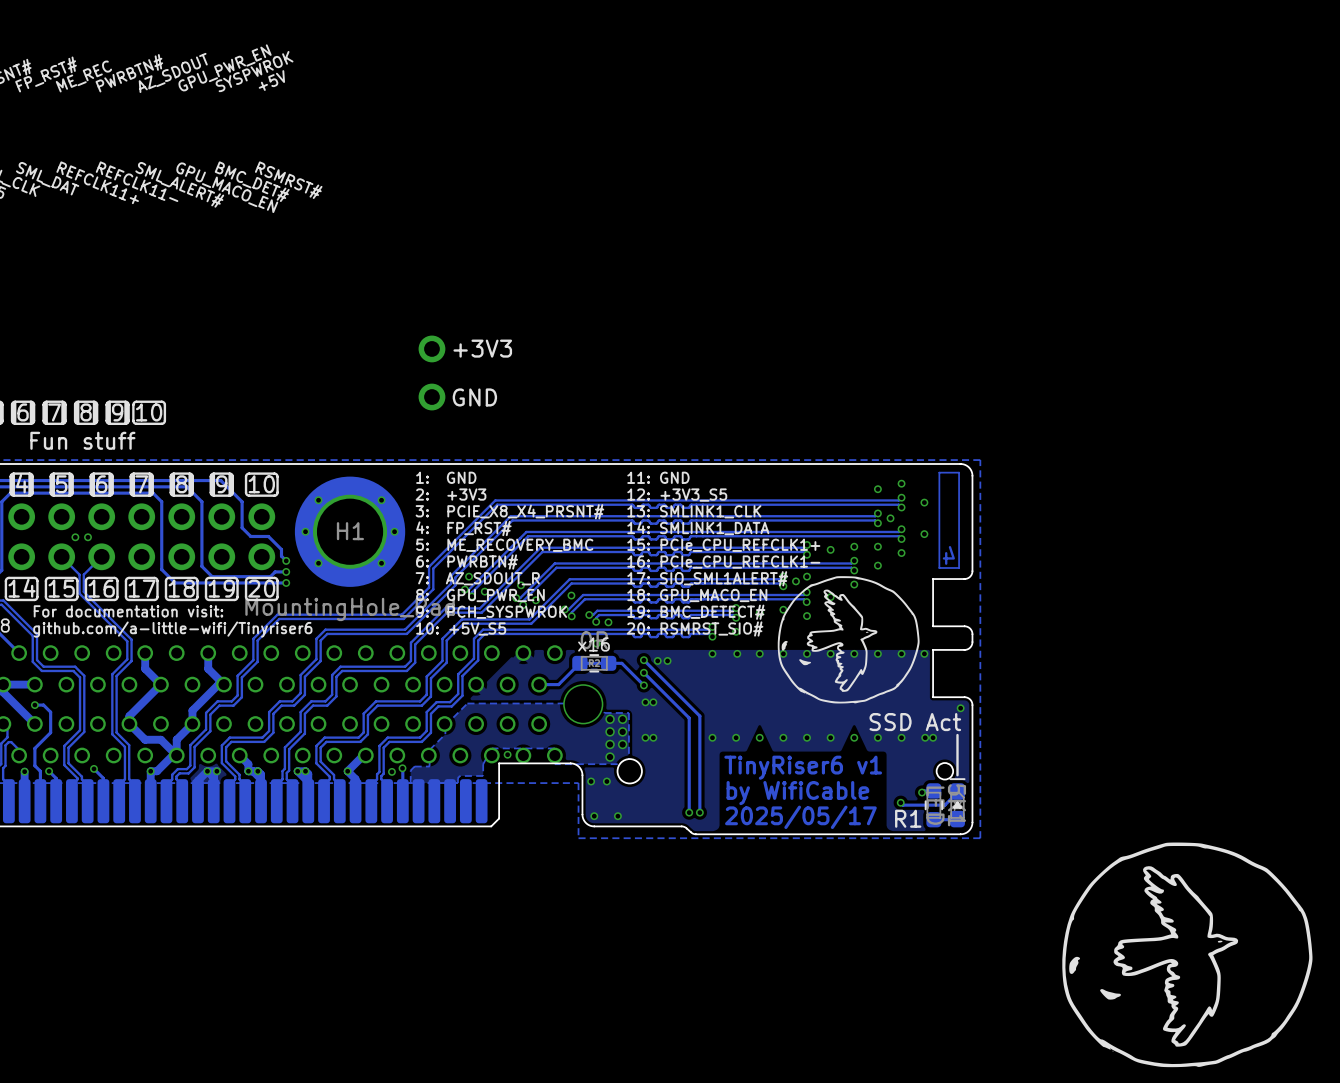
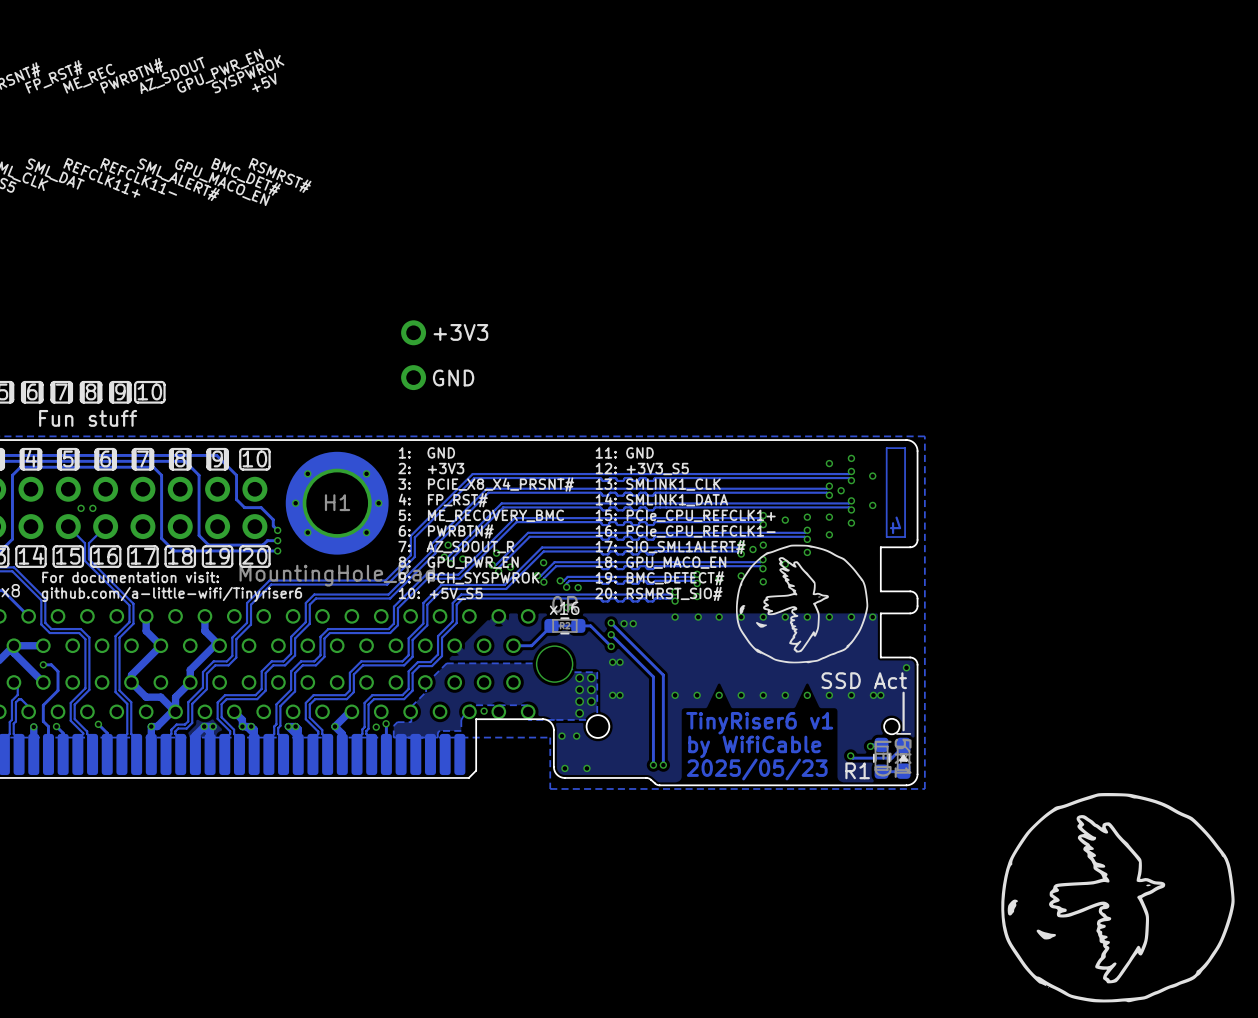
text: 2025/05/17 (800, 817) -> 2025/05/23 (757, 769)

